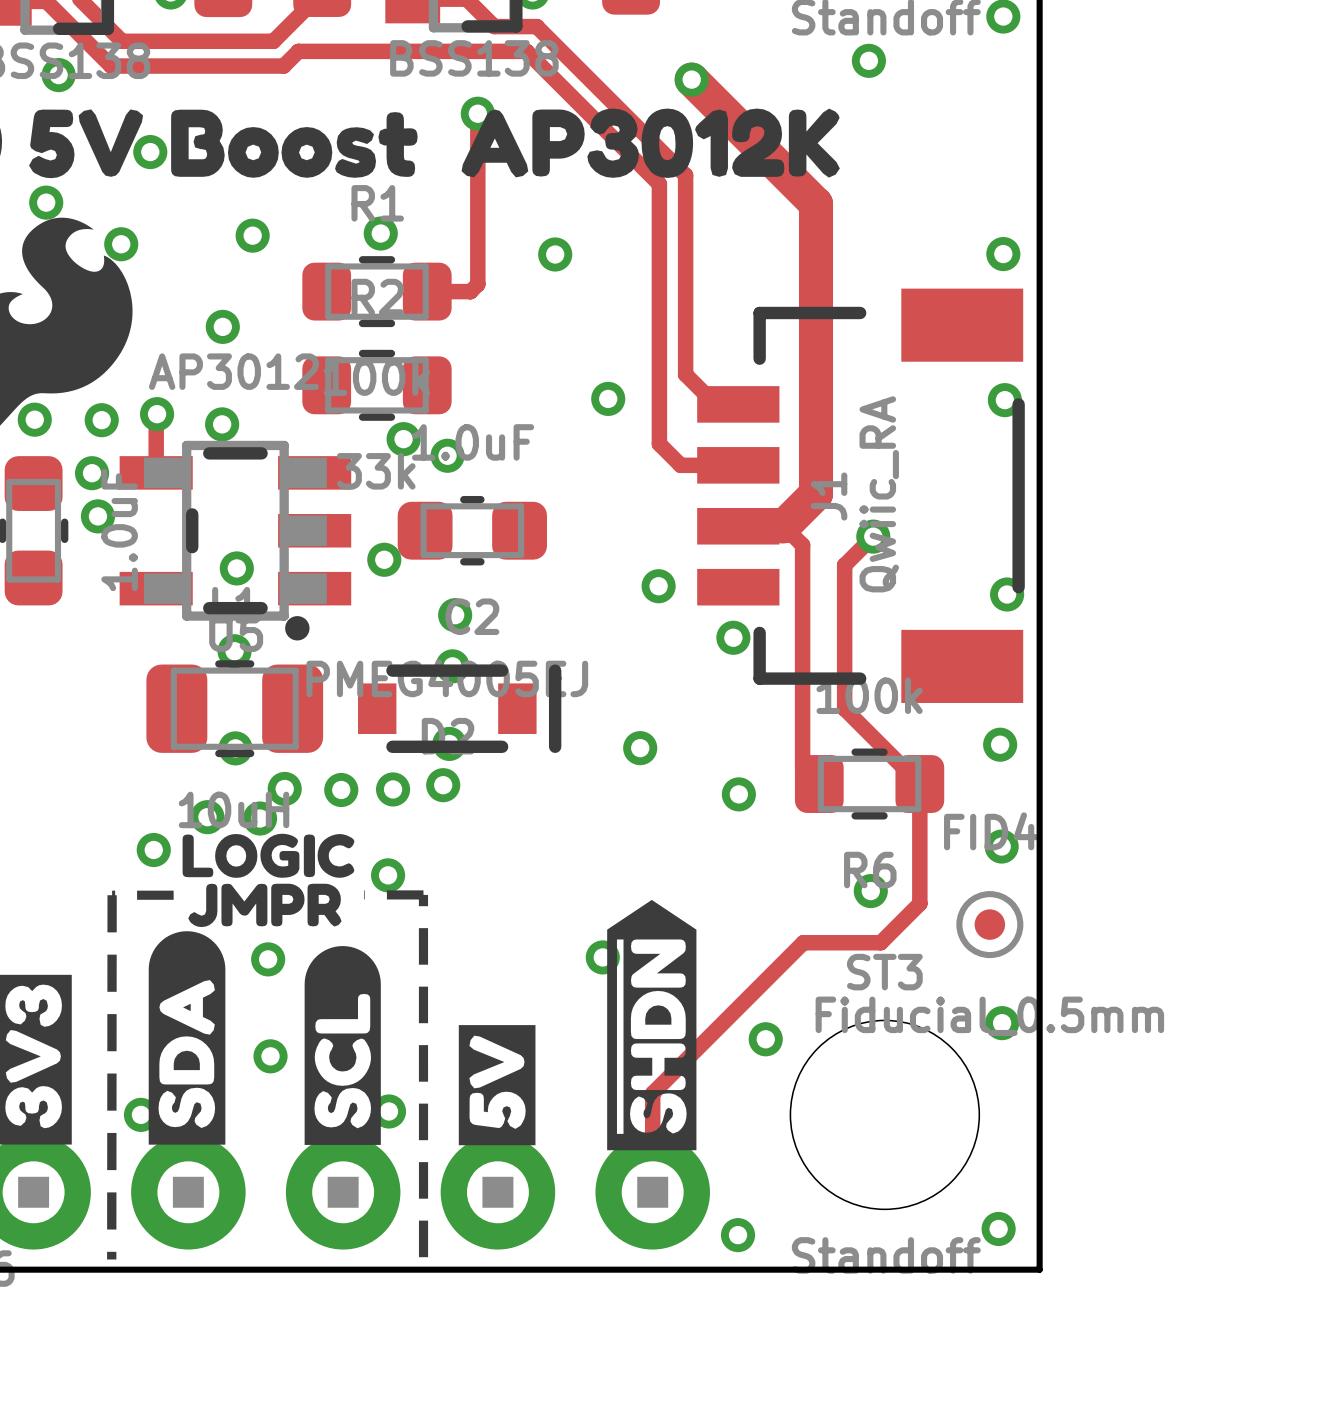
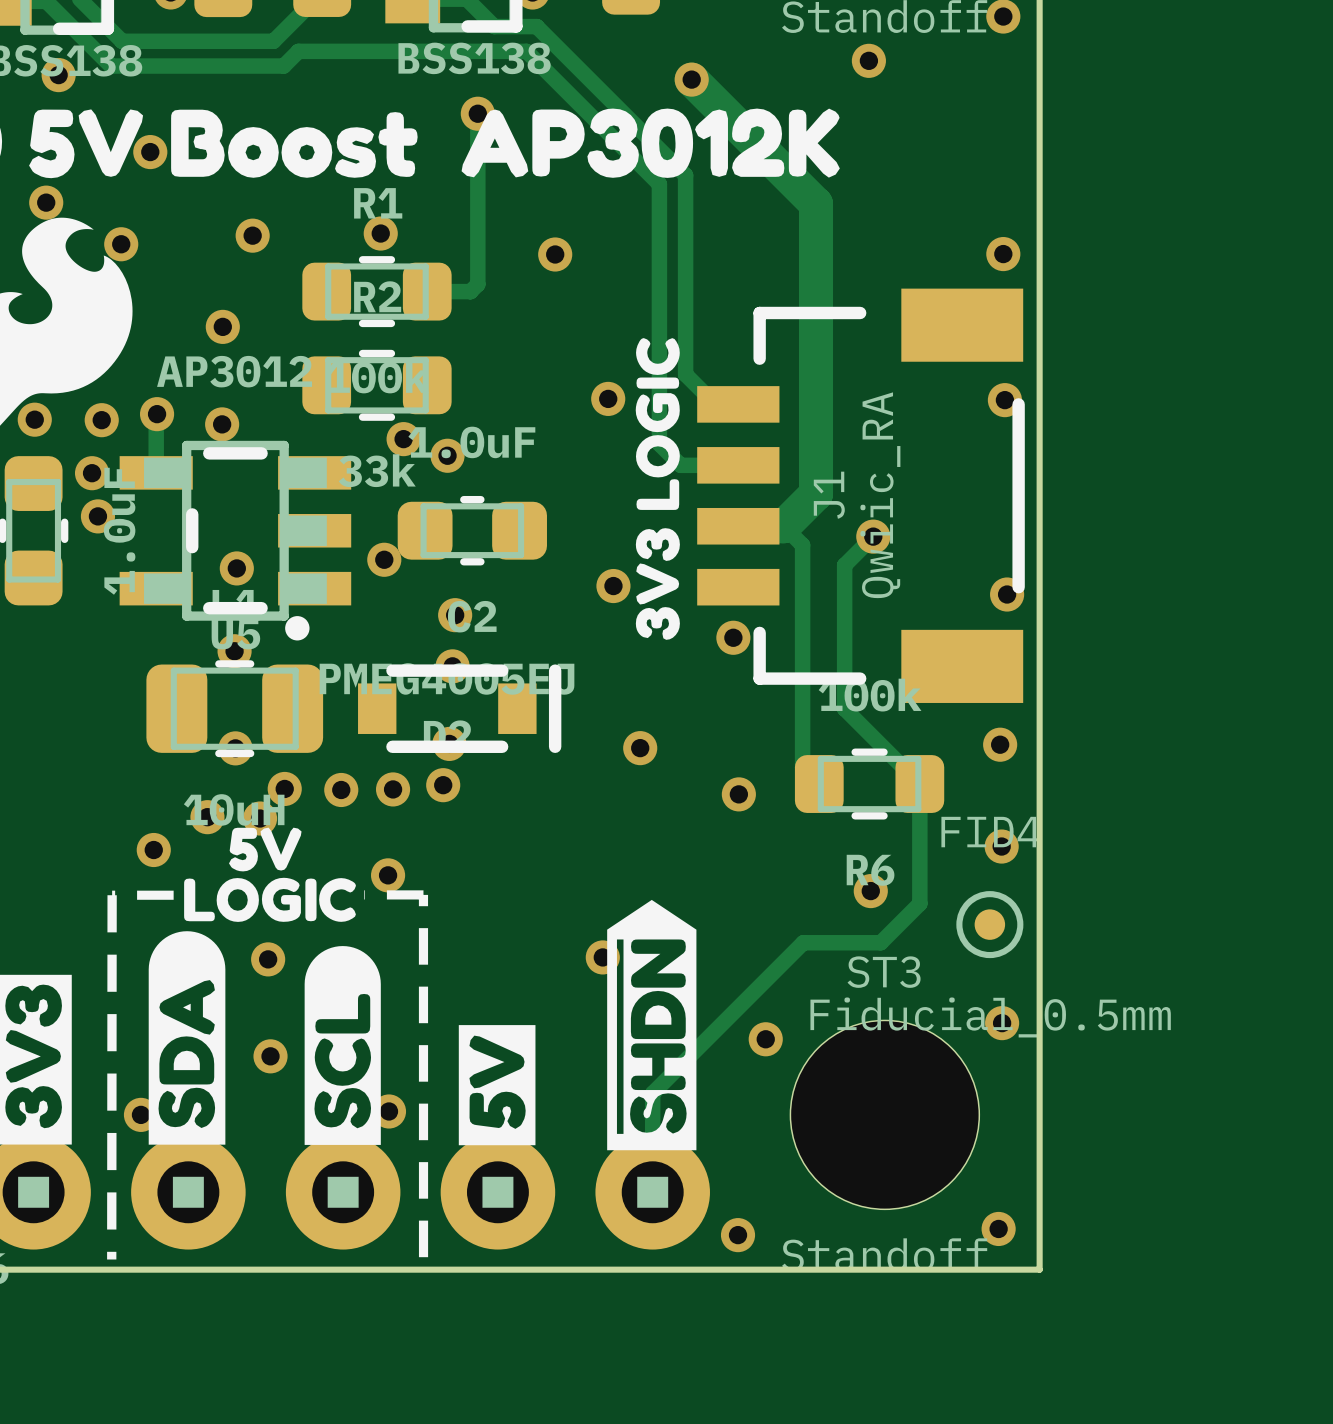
drawing: none -> [635, 338, 680, 640]
via position: (658, 586) -> (613, 586)
drawing: none -> [229, 827, 302, 872]
drawing position: (268, 855) -> (270, 899)
drawing: [188, 883, 342, 928] -> none

